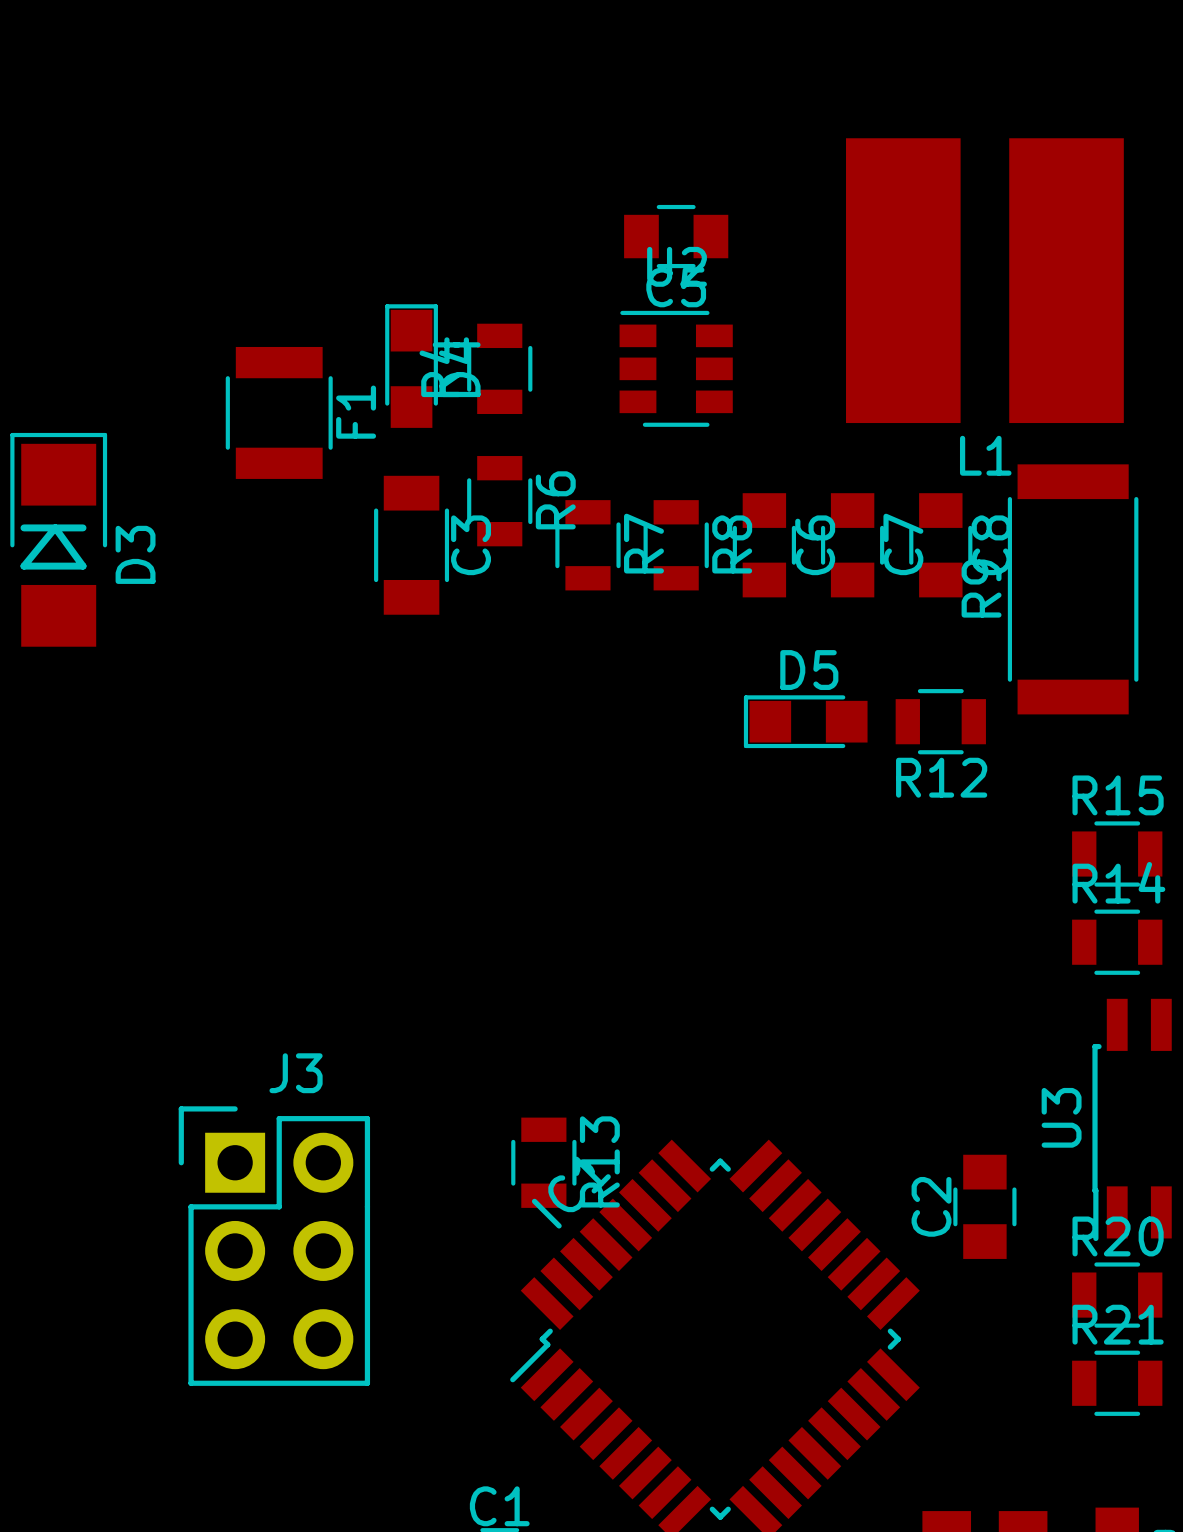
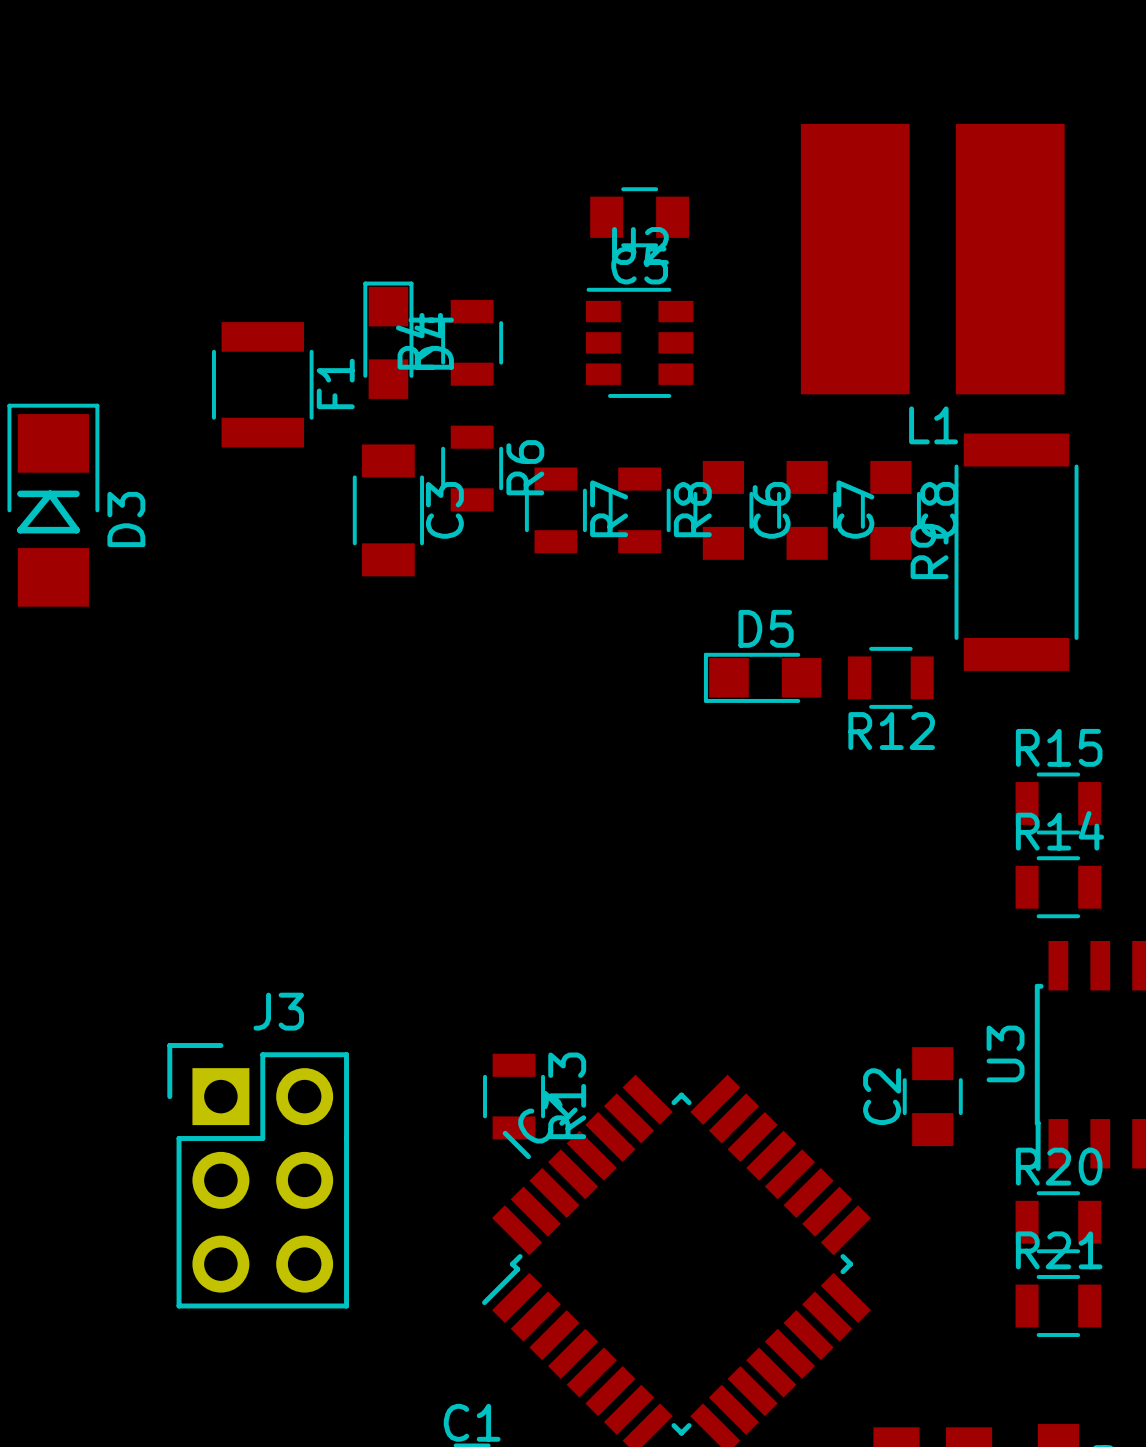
C2 position: (984, 1206) -> (932, 1096)

